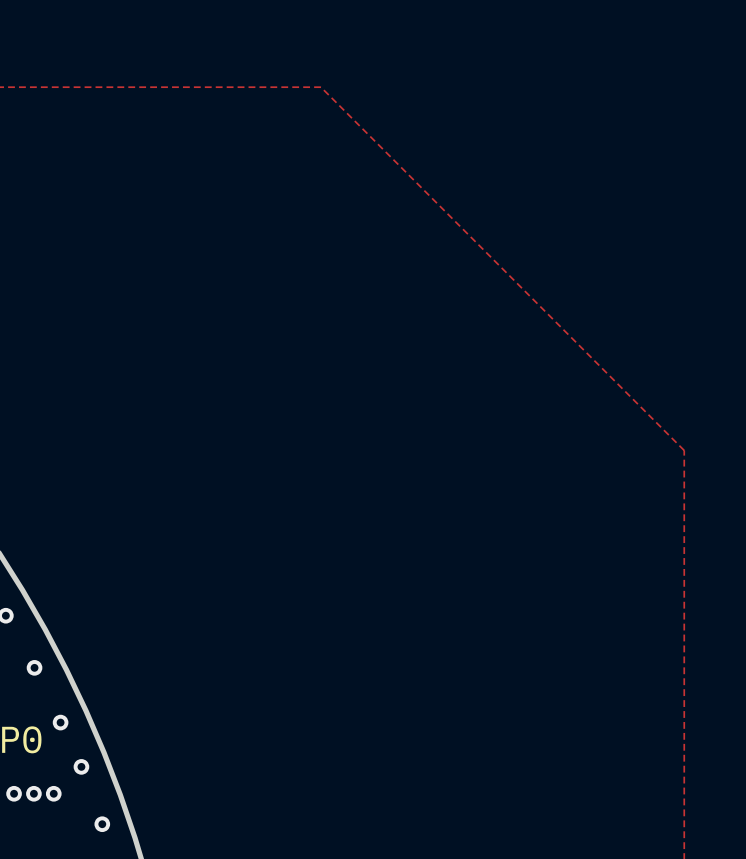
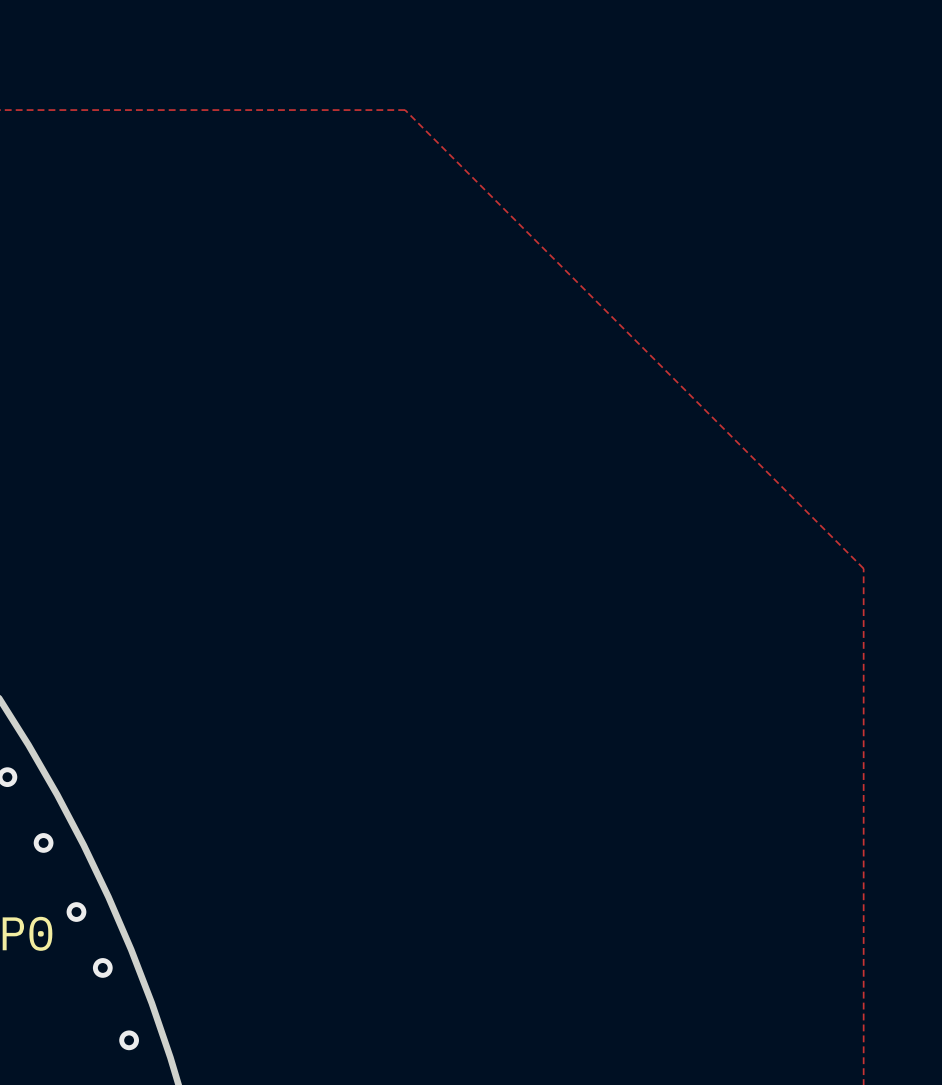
via: (14, 793) -> none
via: (33, 793) -> none
via: (53, 793) -> none

